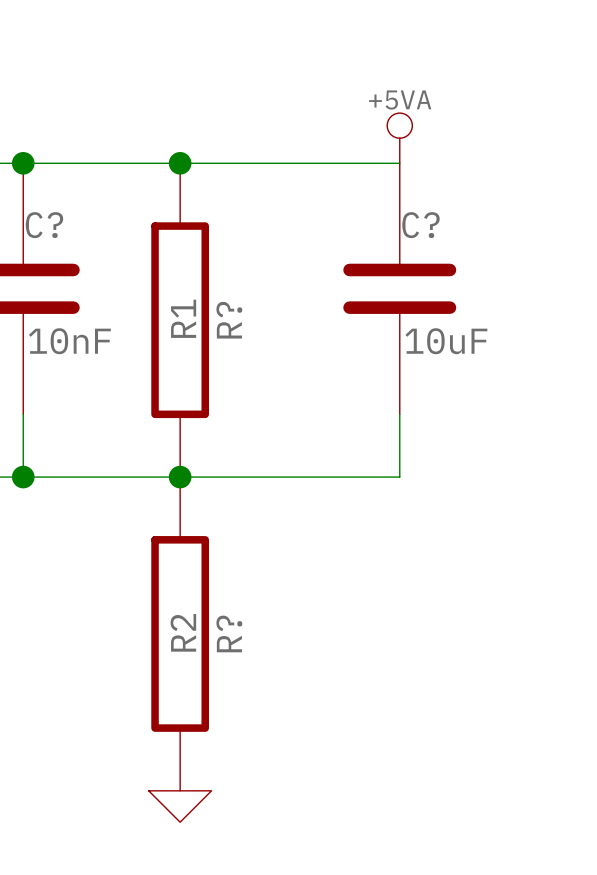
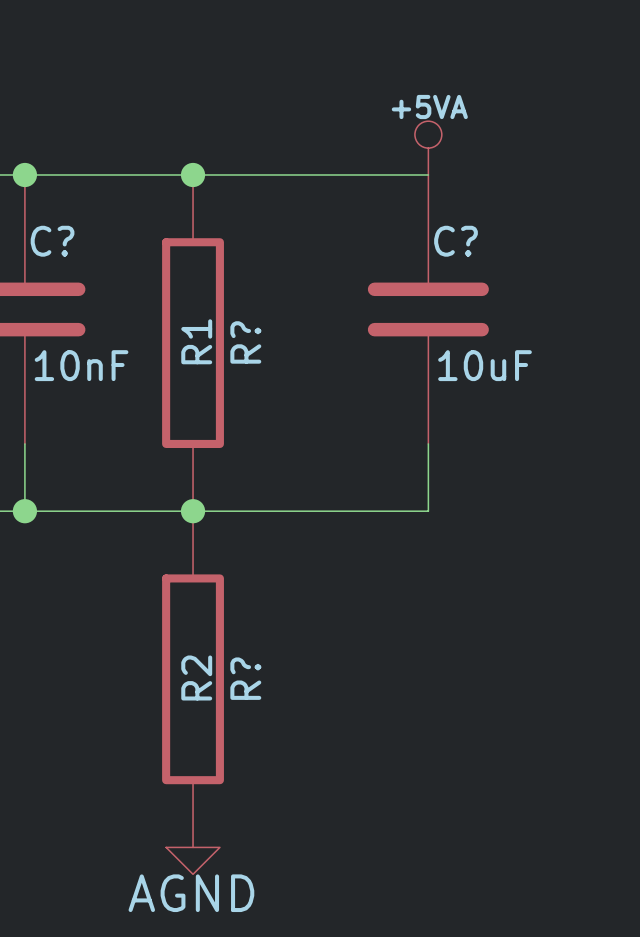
power symbol shape: [148, 790, 212, 823] -> [166, 847, 220, 875]
power symbol text: none -> AGND (191, 893)

